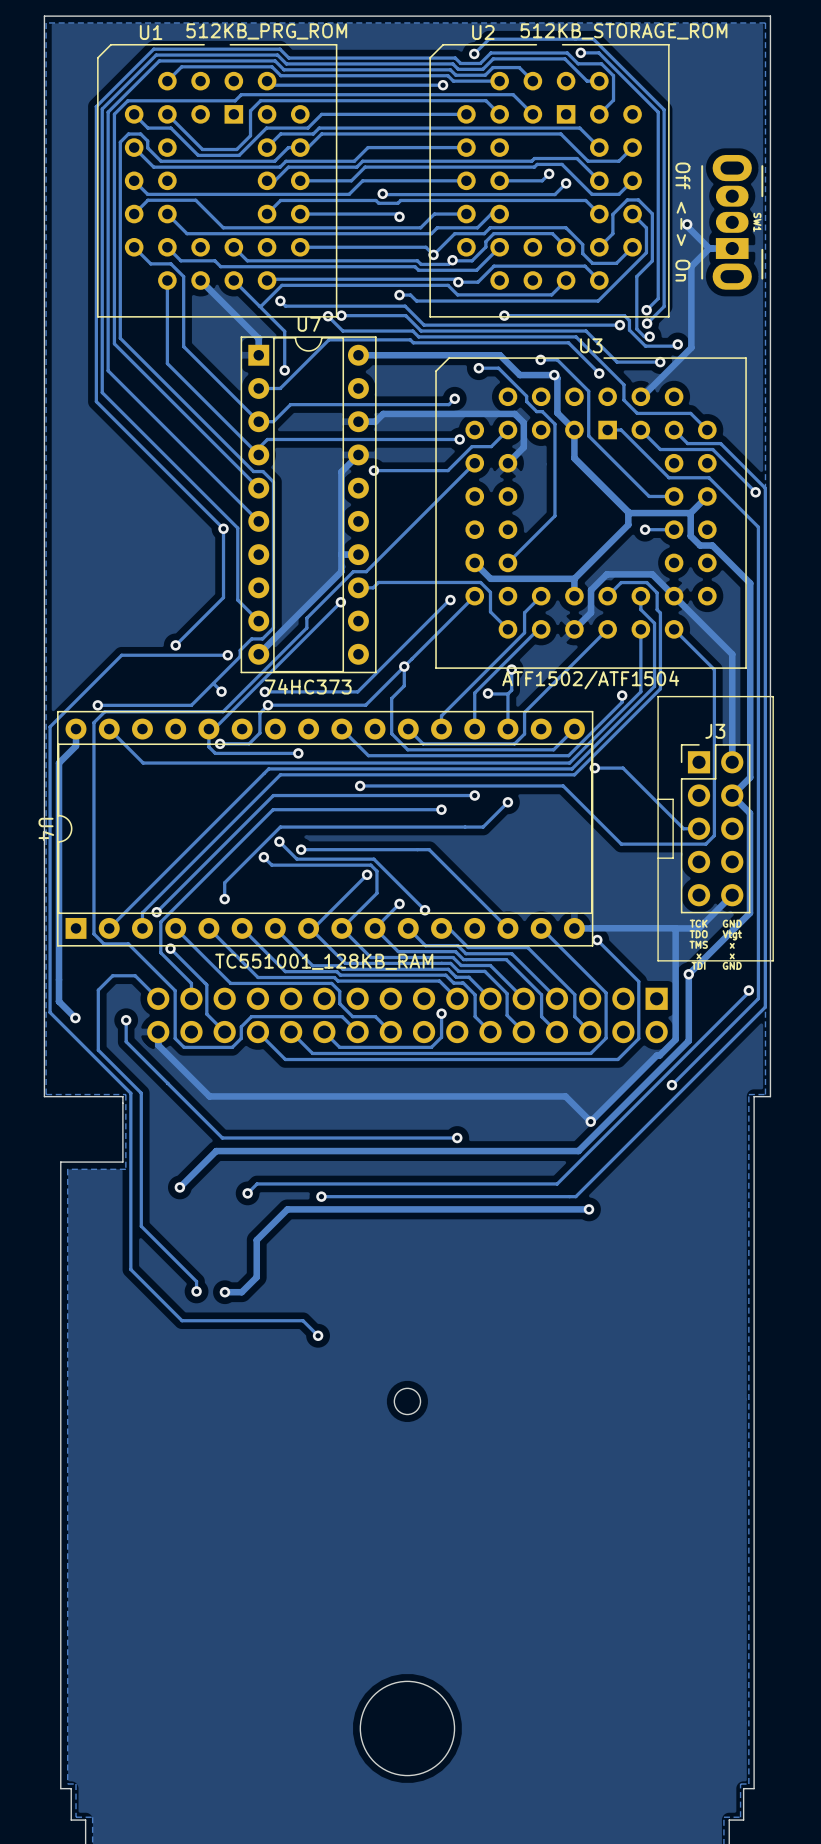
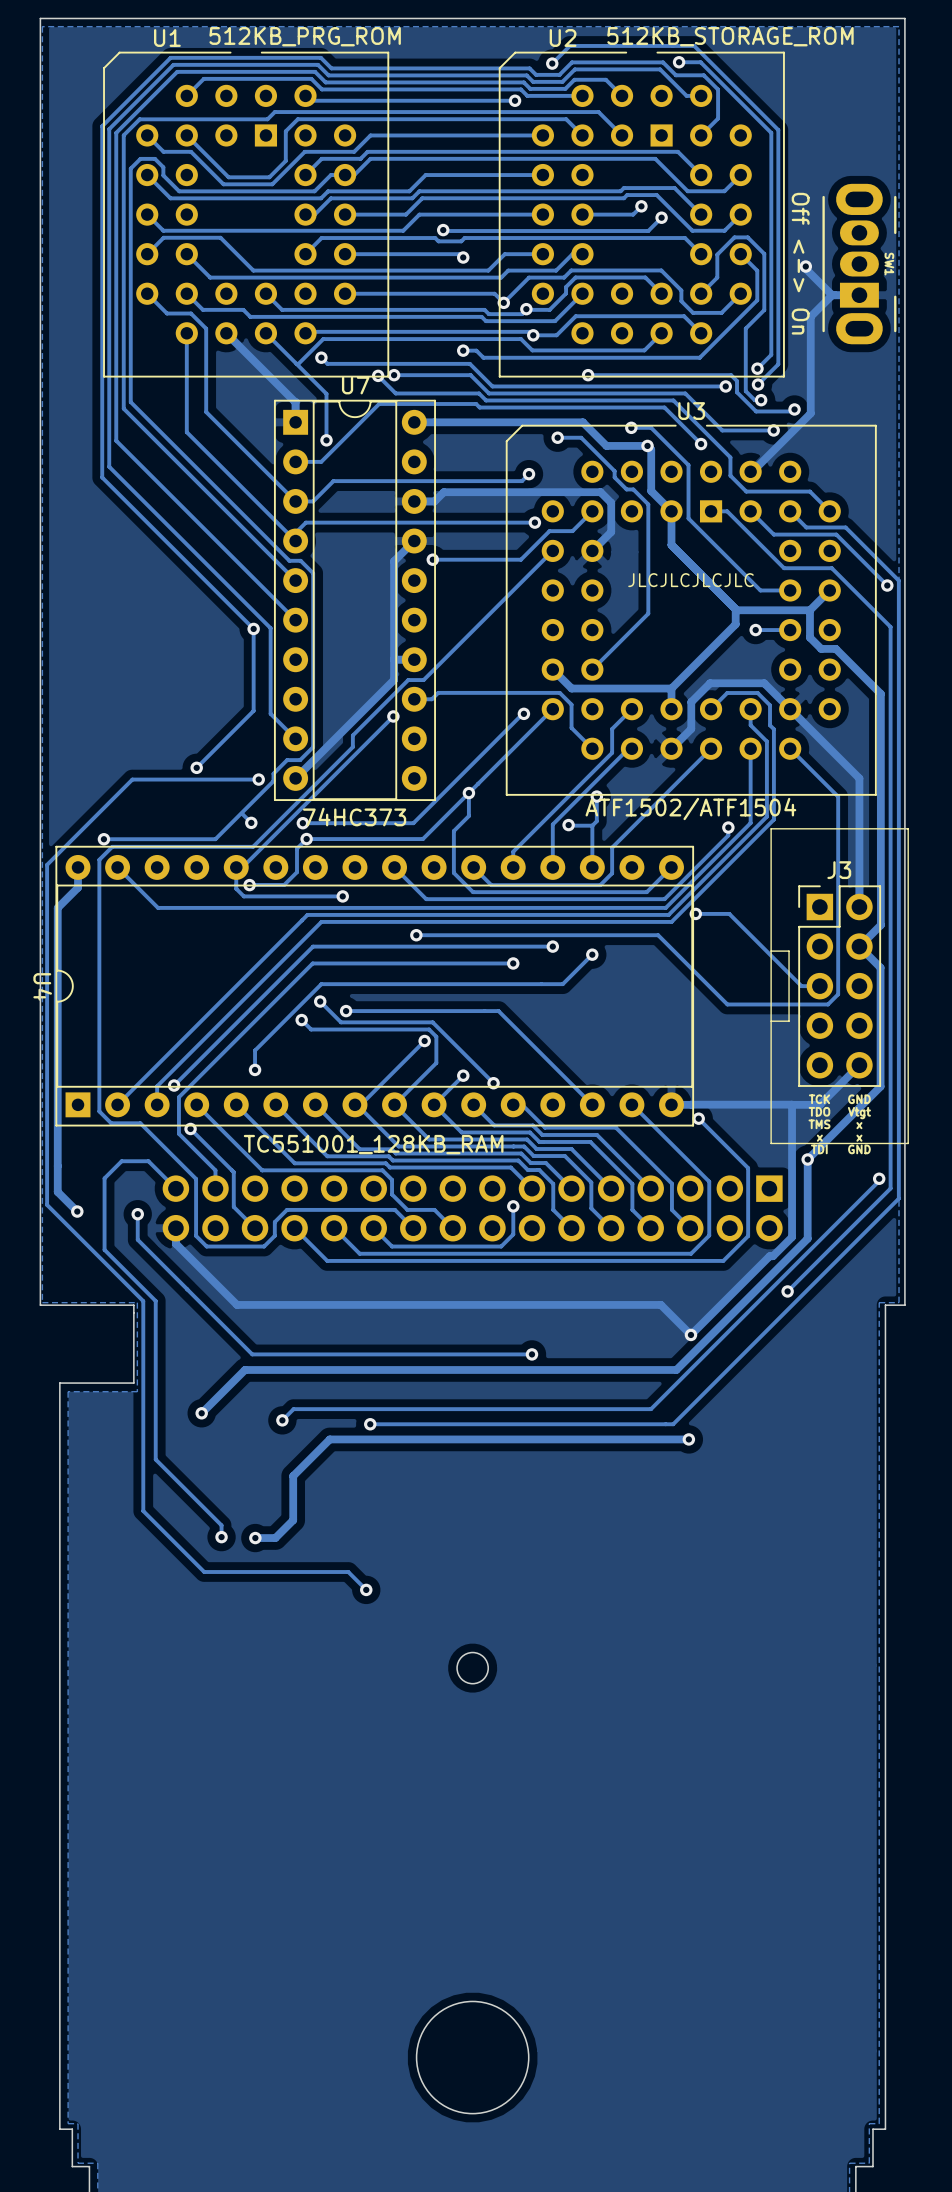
text: none -> JLCJLCJLCJLC (690, 580)

